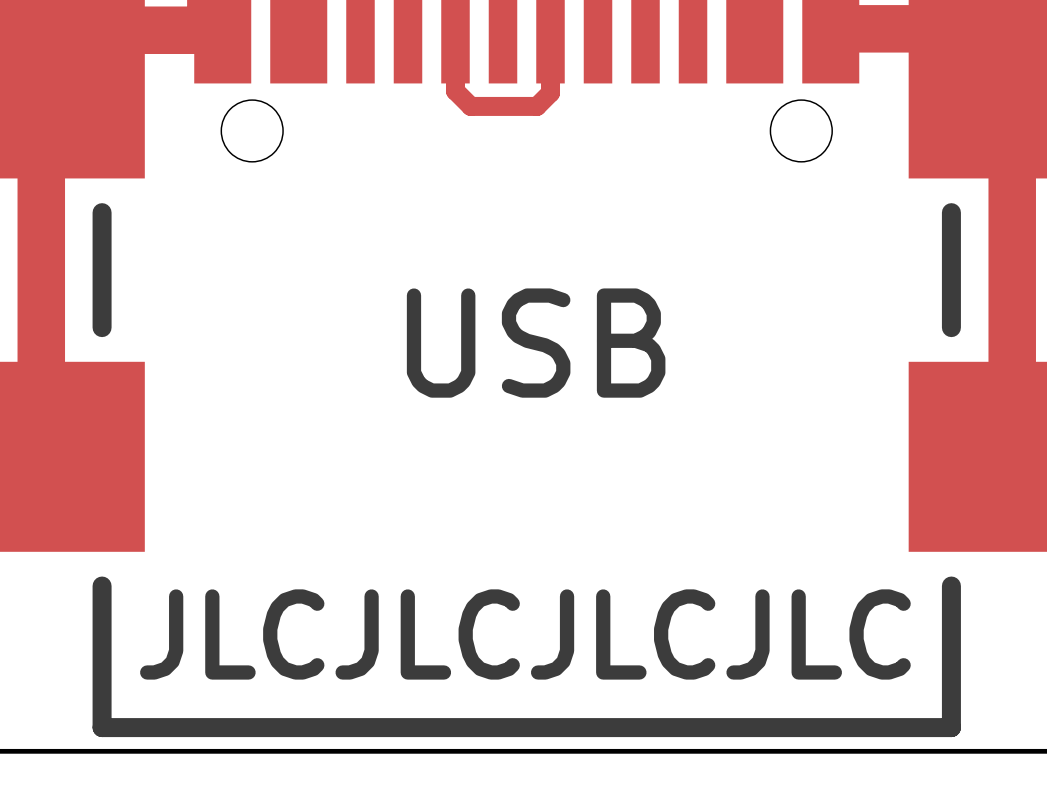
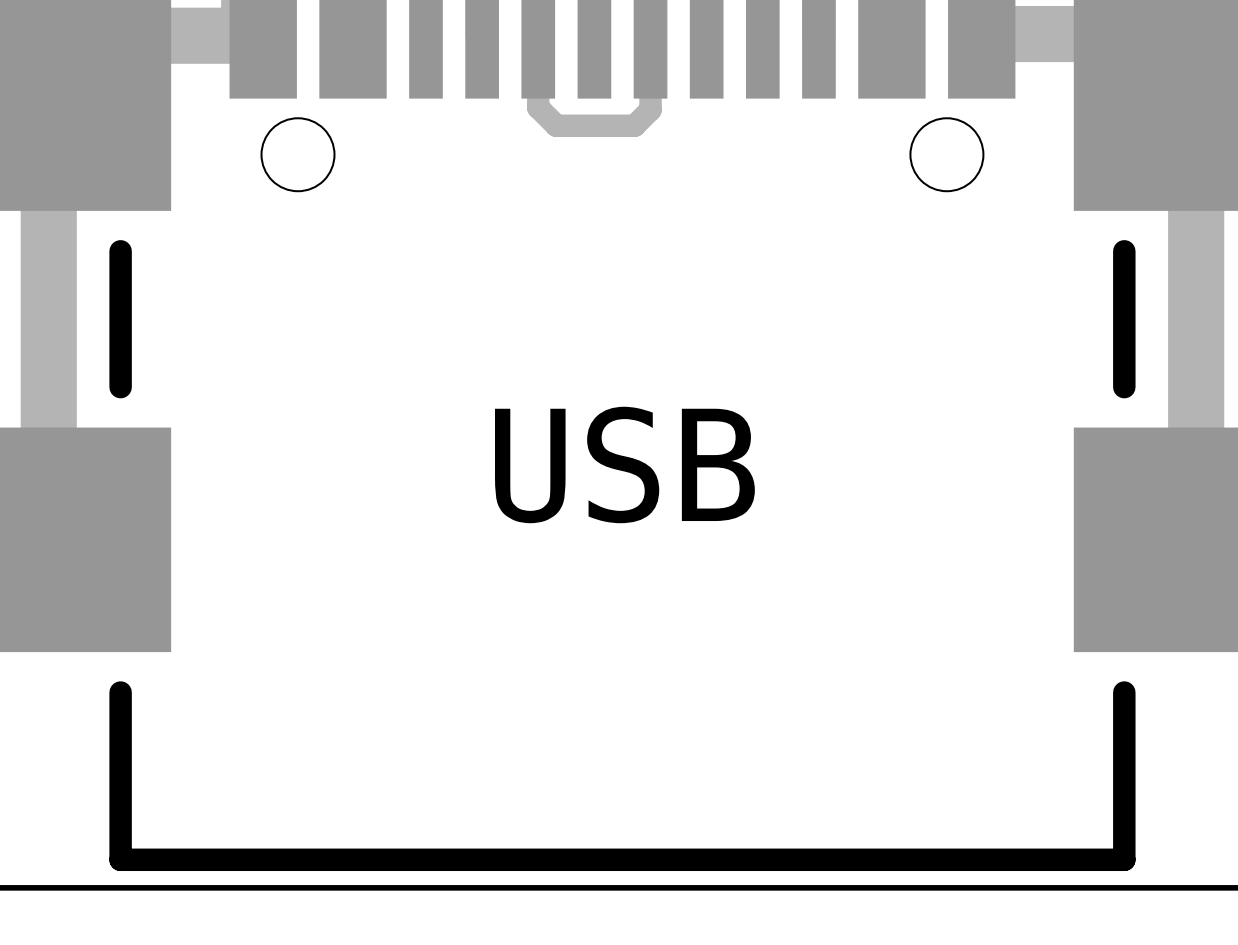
text position: USB (536, 343) -> USB (624, 464)
text: JLCJLCJLCJLC (525, 634) -> none

